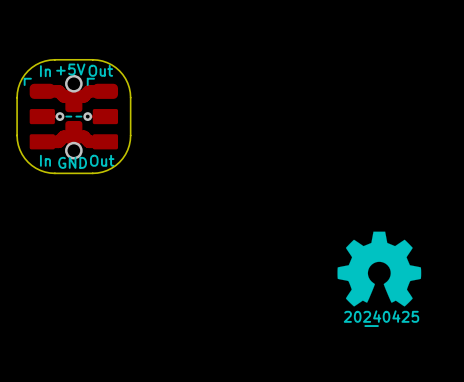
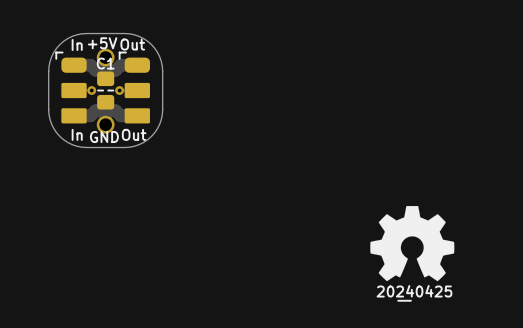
C1 name: none -> C1 (105, 63)

